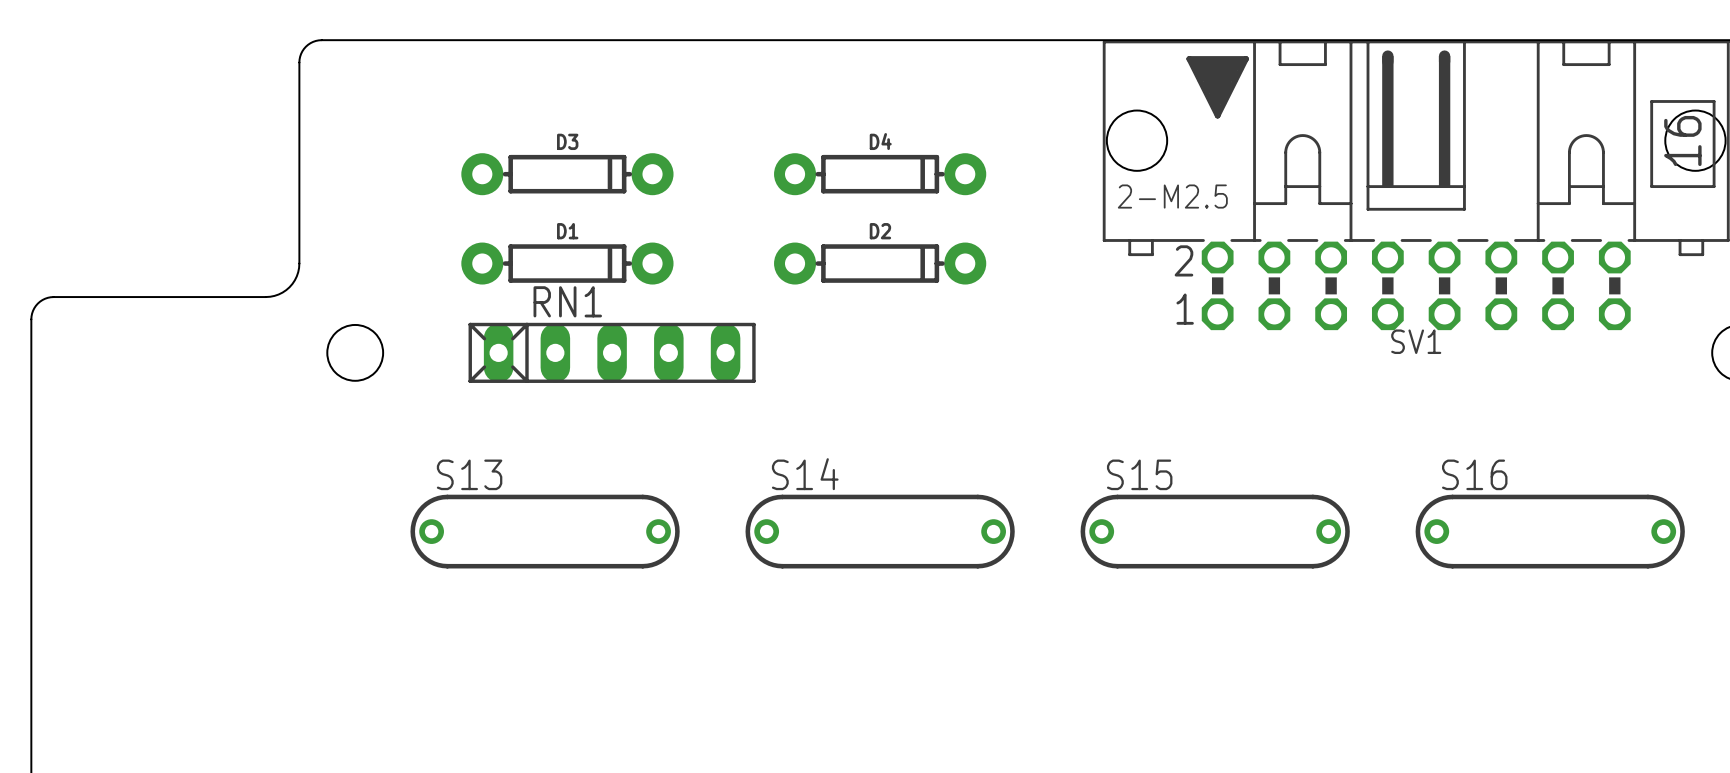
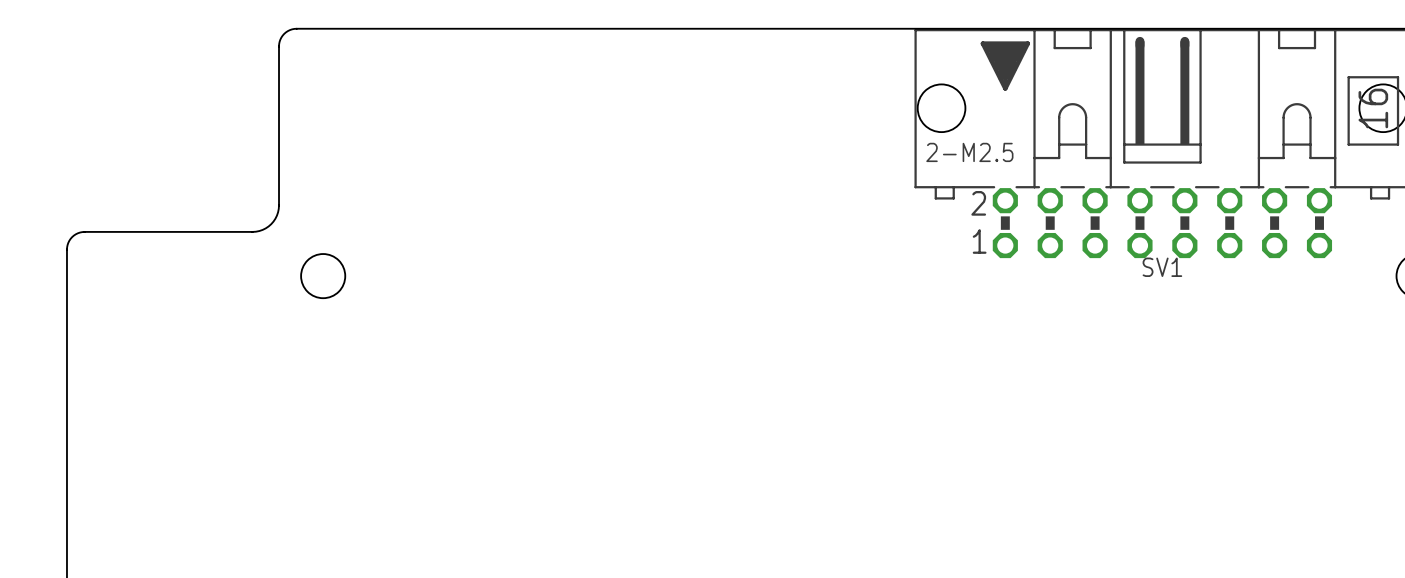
D3: (567, 174) -> none
D4: (880, 174) -> none
D1: (567, 263) -> none
D2: (880, 263) -> none
RN1: (612, 352) -> none
S13: (545, 531) -> none
S14: (880, 531) -> none
S15: (1215, 531) -> none
S16: (1550, 531) -> none

